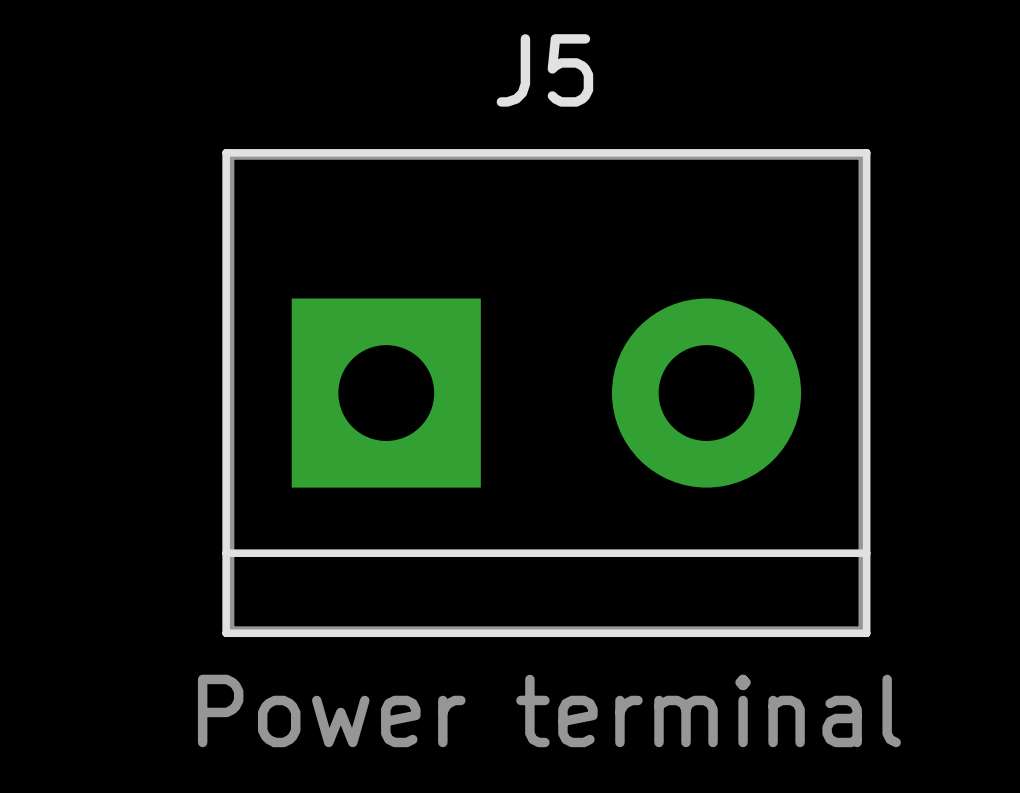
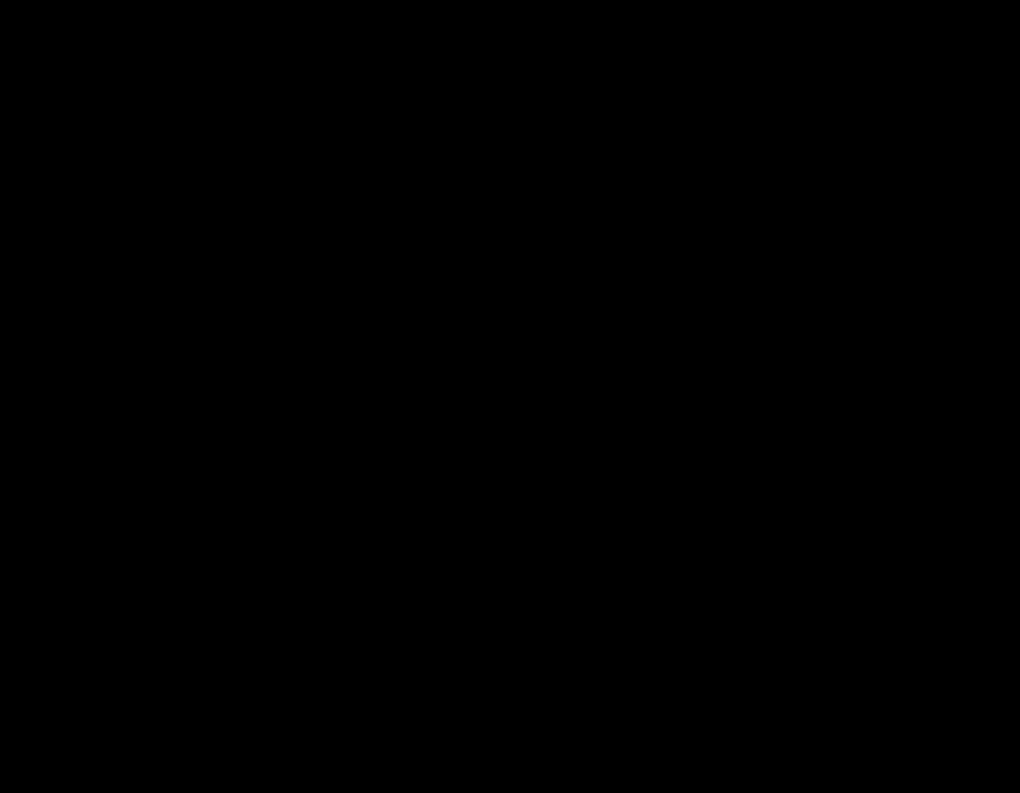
J5: Power terminal (546, 393) -> none

